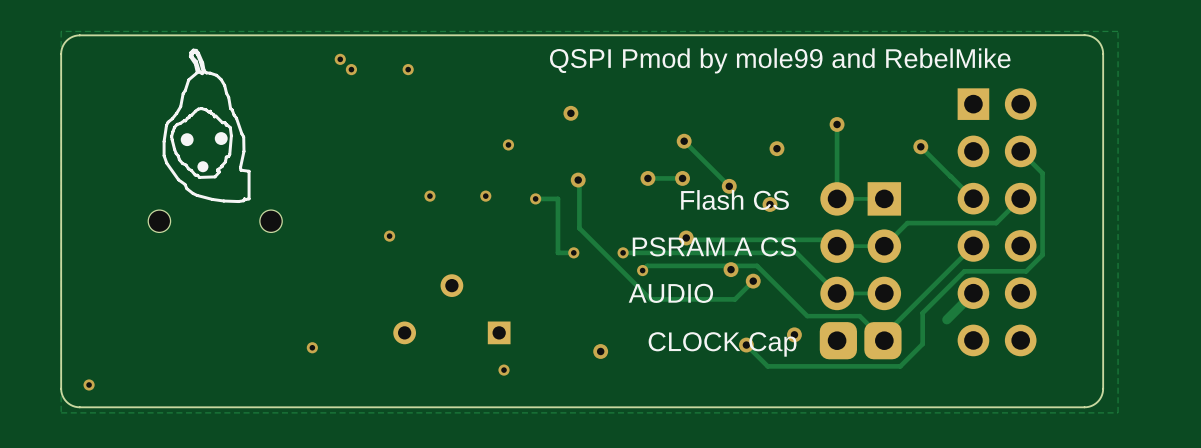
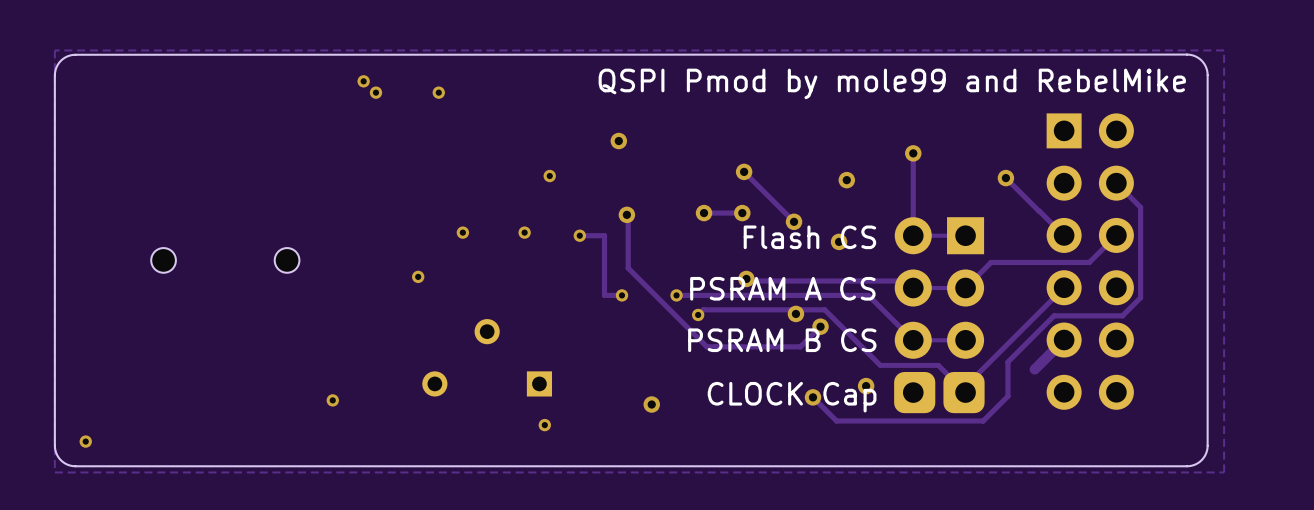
line: (193, 50) (198, 53) (205, 71) (216, 75) (224, 85) (230, 108) (243, 136) (243, 151) (240, 167) (241, 170) (249, 171) (249, 198) (238, 201) (223, 201) (197, 195) (186, 188) (166, 163) (164, 155) (166, 125) (180, 106) (188, 79) (197, 72) (195, 64) (190, 56) (193, 50) -> none
line: (194, 51) (200, 61) (202, 73) (191, 56) (194, 51) -> none
line: (201, 108) (210, 111) (214, 116) (230, 127) (229, 154) (226, 157) (222, 166) (217, 169) (219, 171) (215, 176) (199, 177) (195, 175) (179, 159) (172, 139) (172, 131) (177, 124) (185, 120) (195, 111) (201, 108) -> none
drawing: [180, 132, 228, 173] -> none
text: AUDIO (670, 293) -> PSRAM B CS (782, 340)

